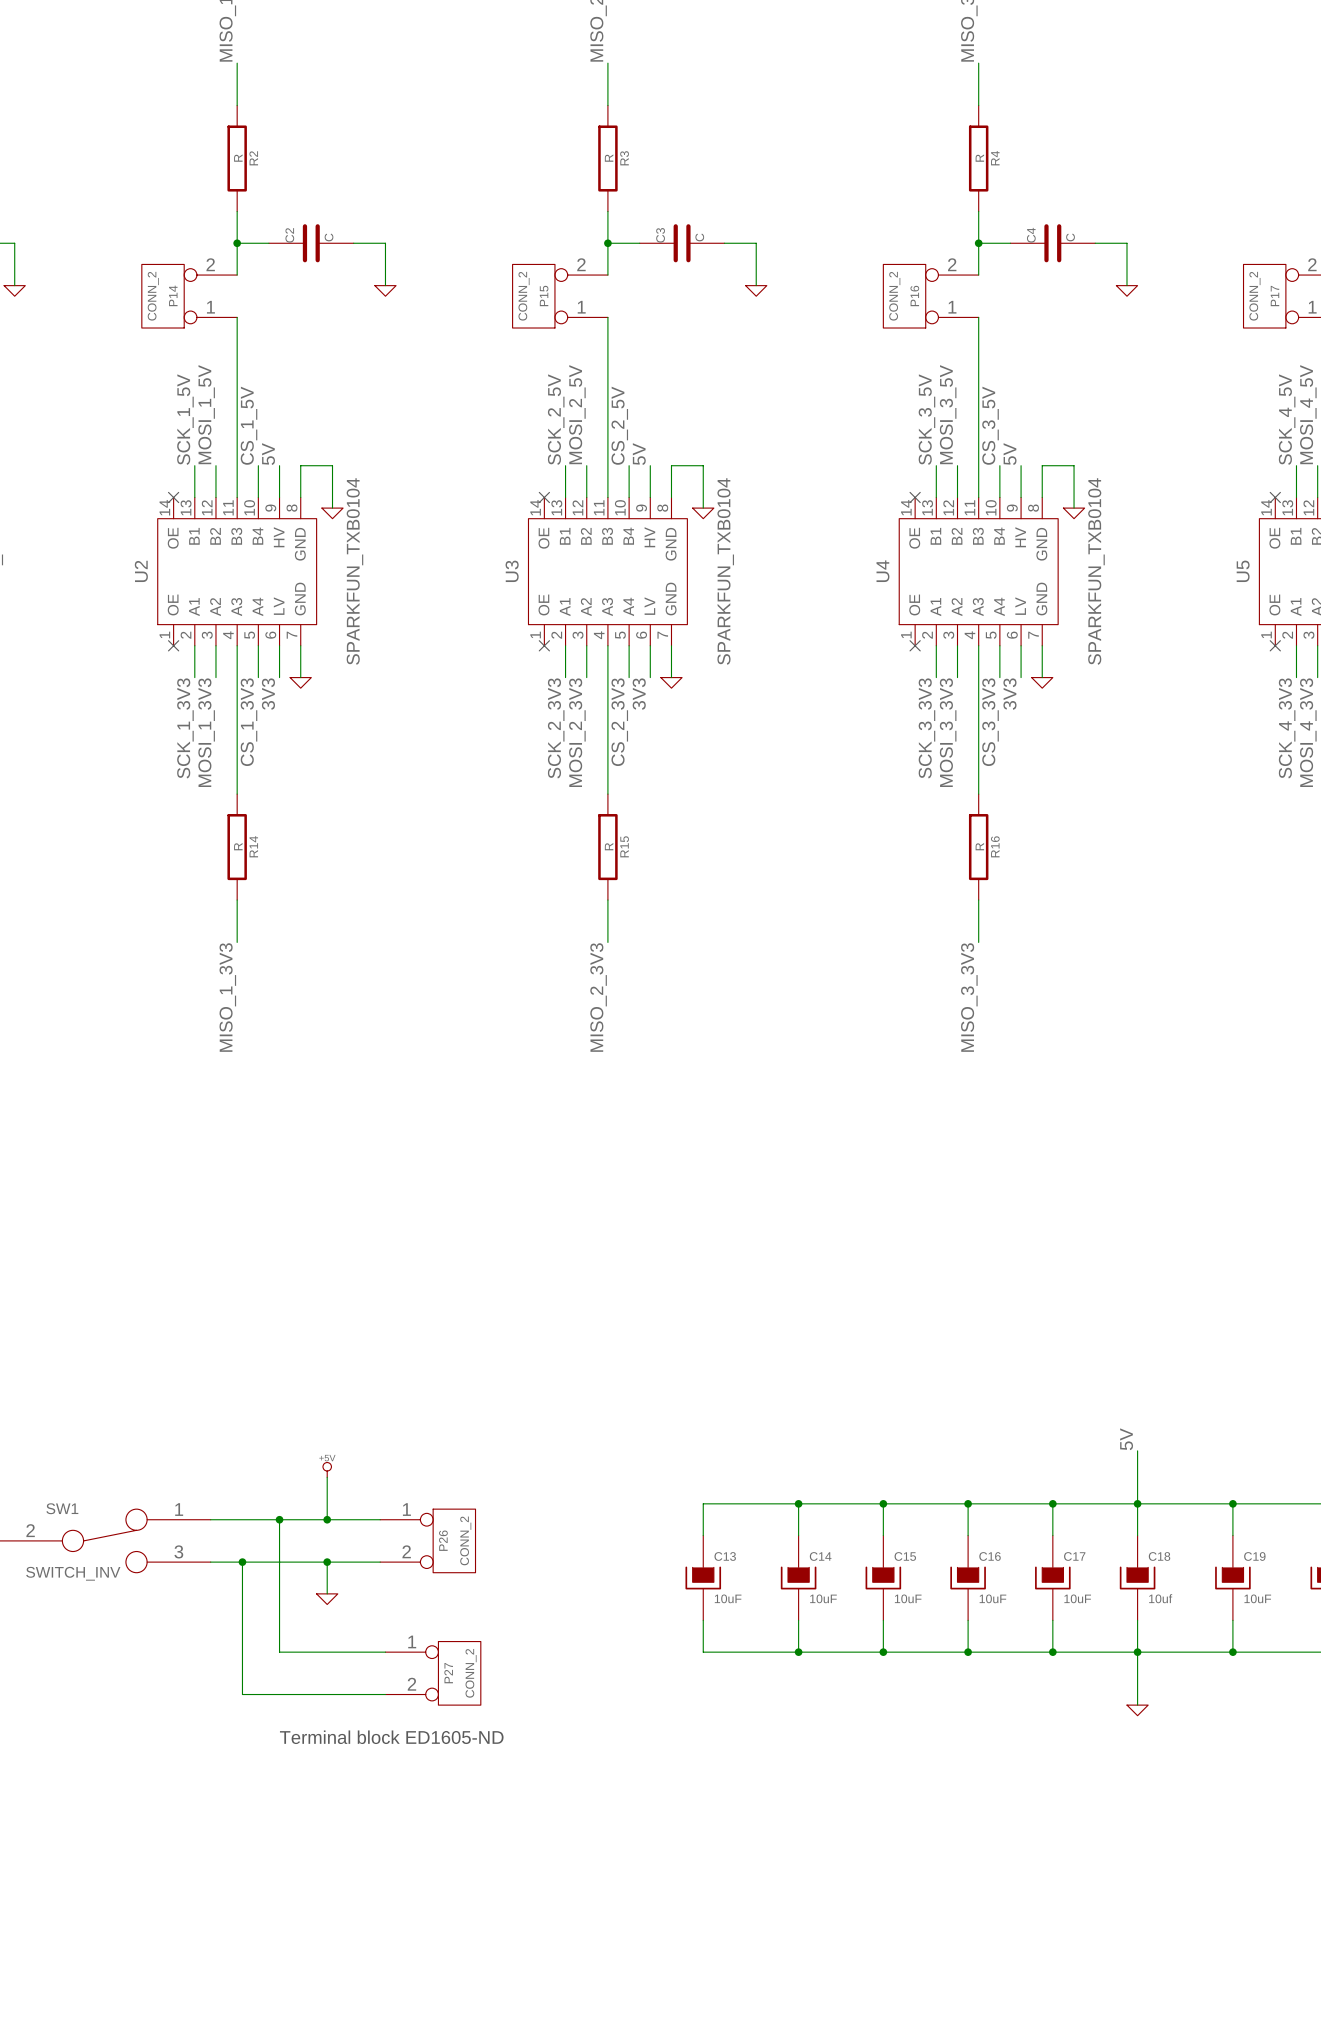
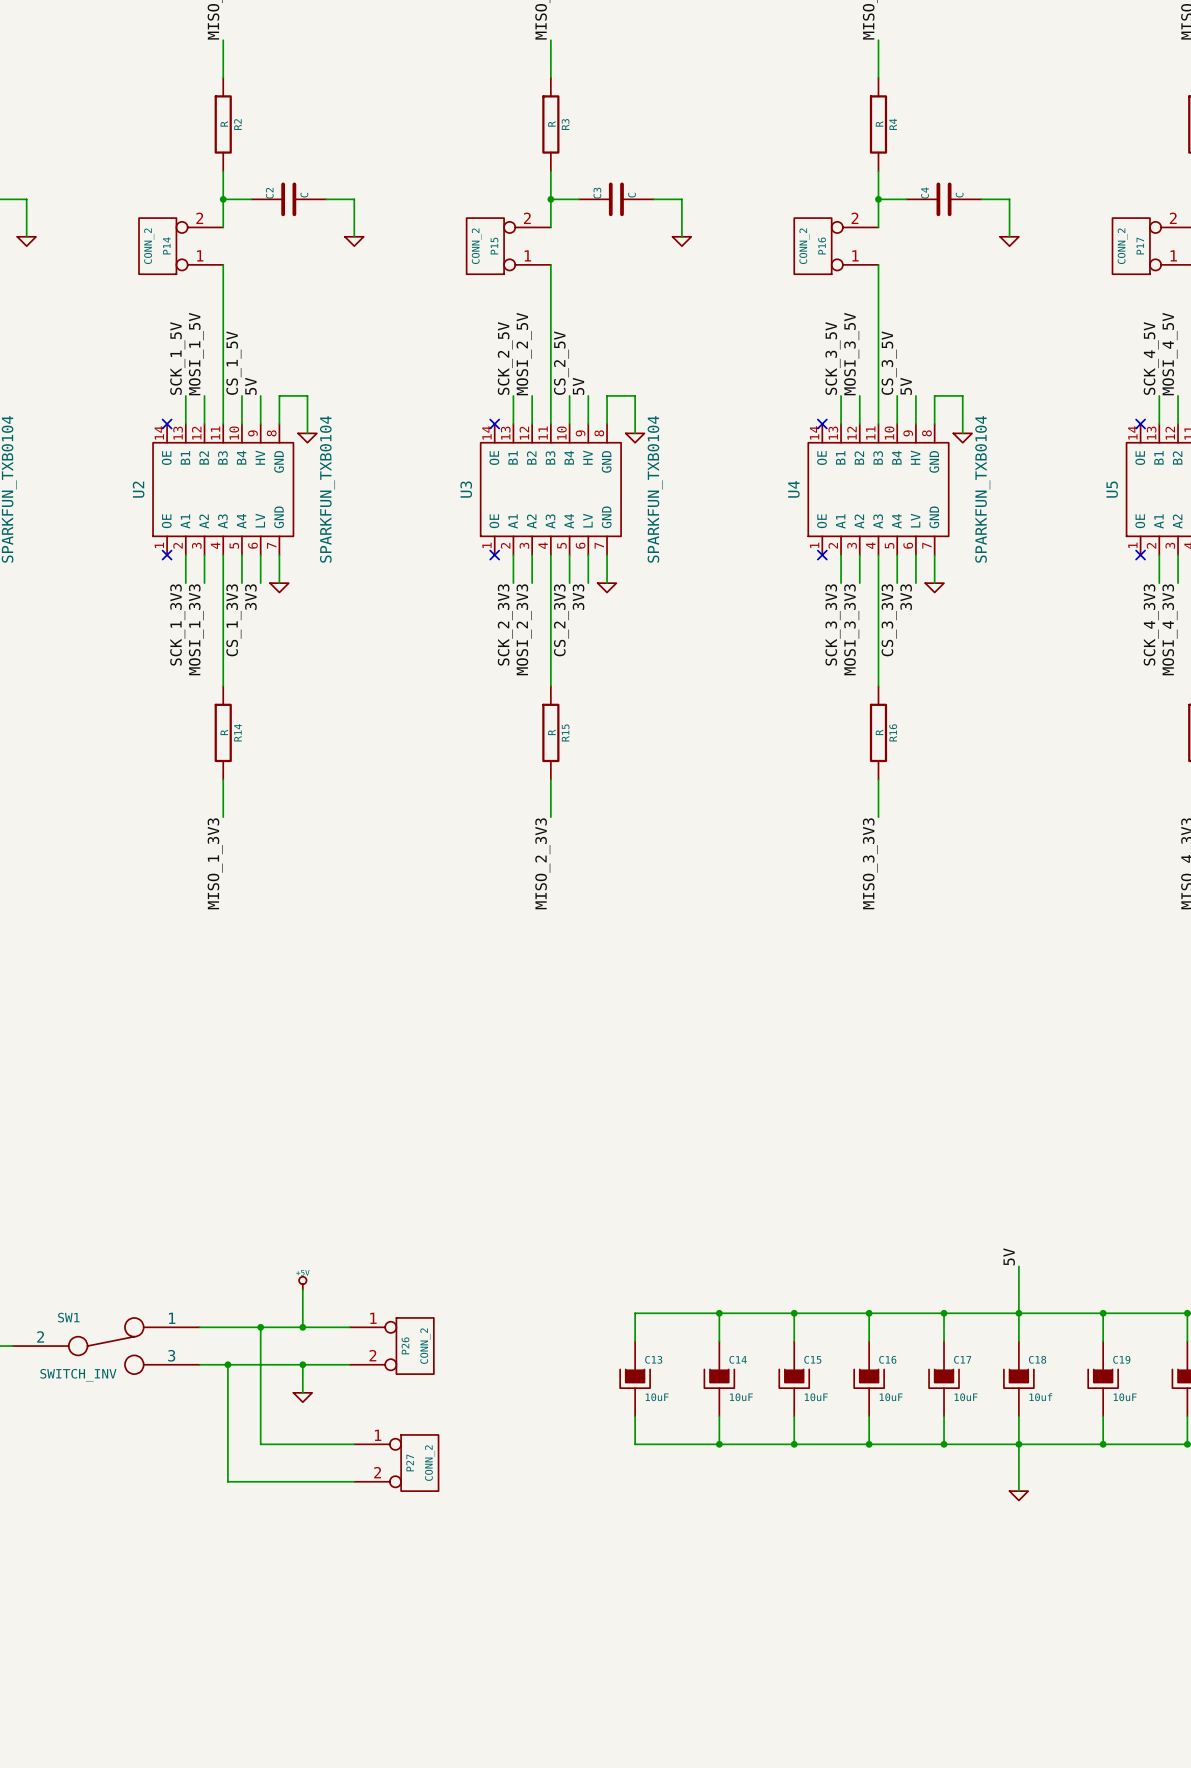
text: Terminal block ED1605-ND (391, 1737) -> none

